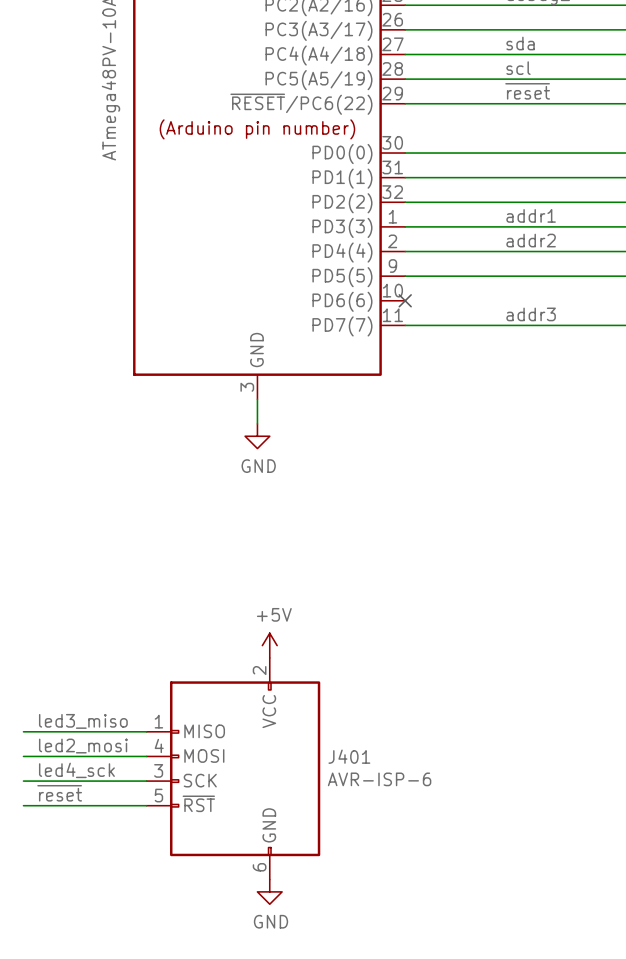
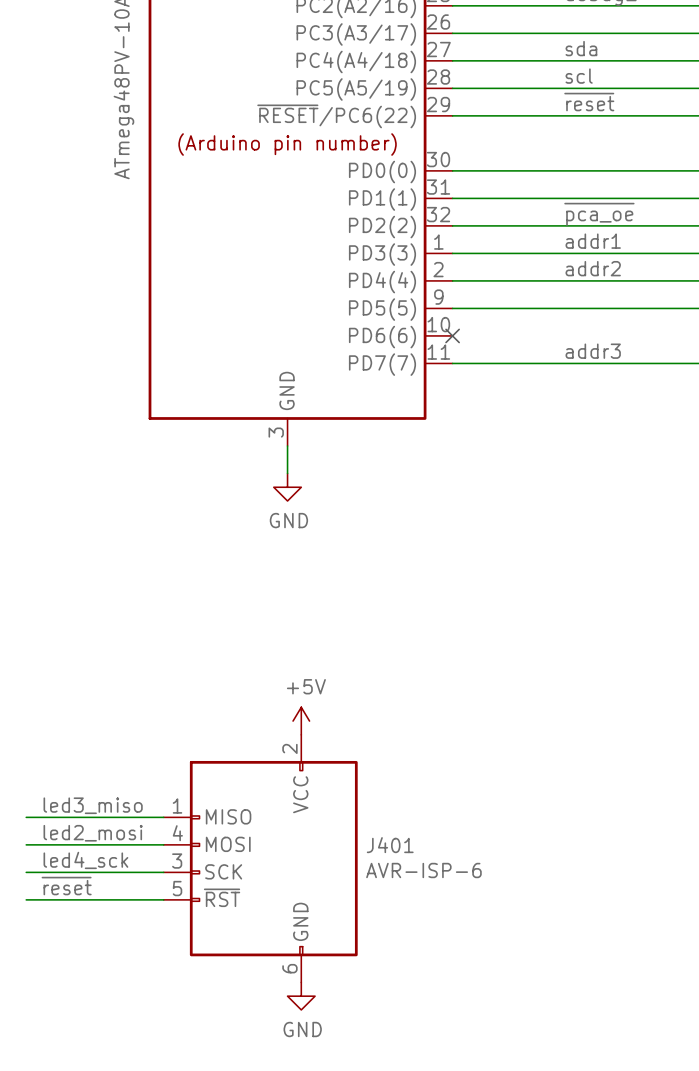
label: none -> ~{pca_oe} (599, 214)

